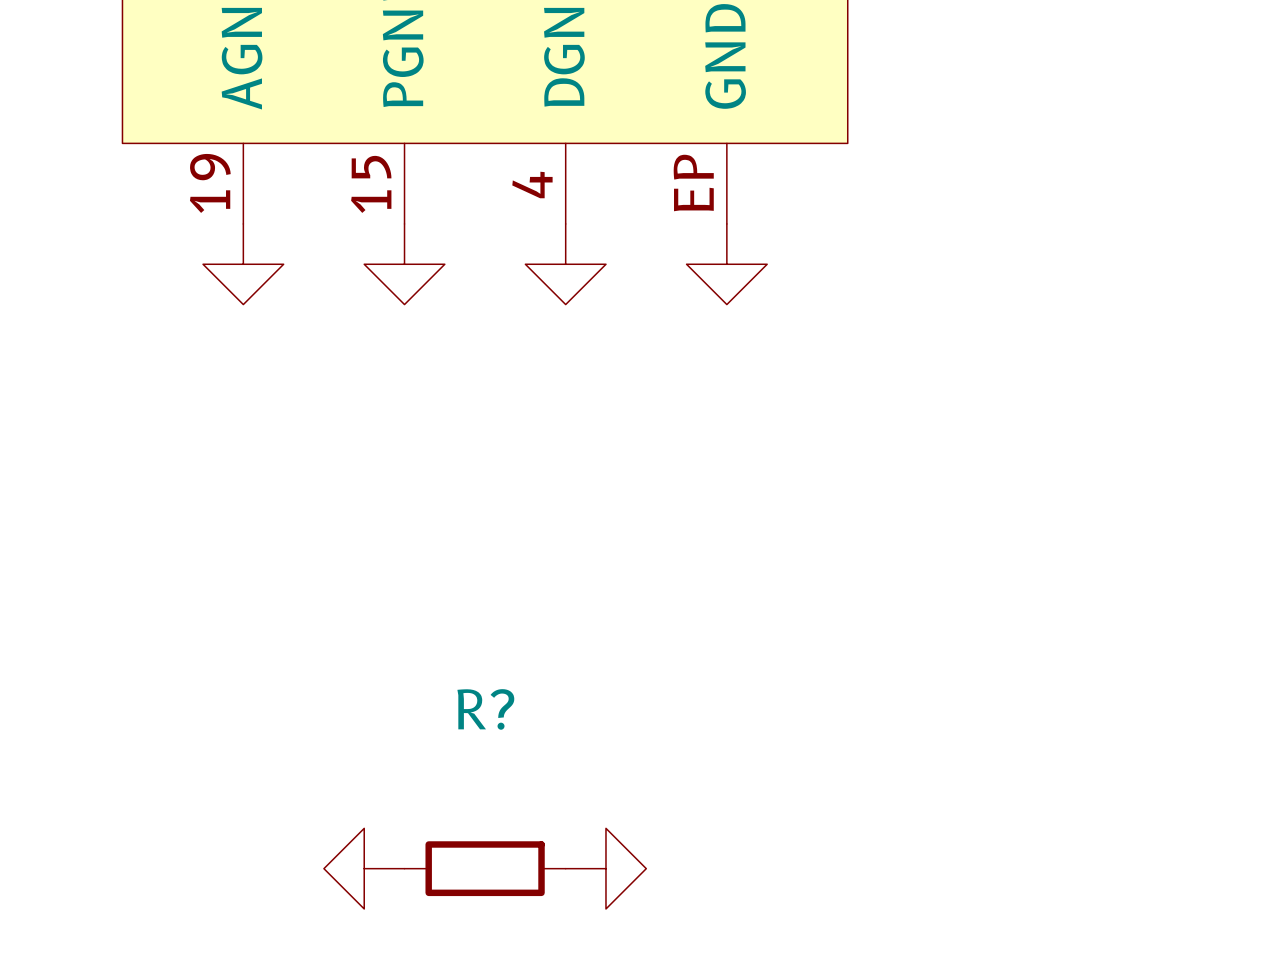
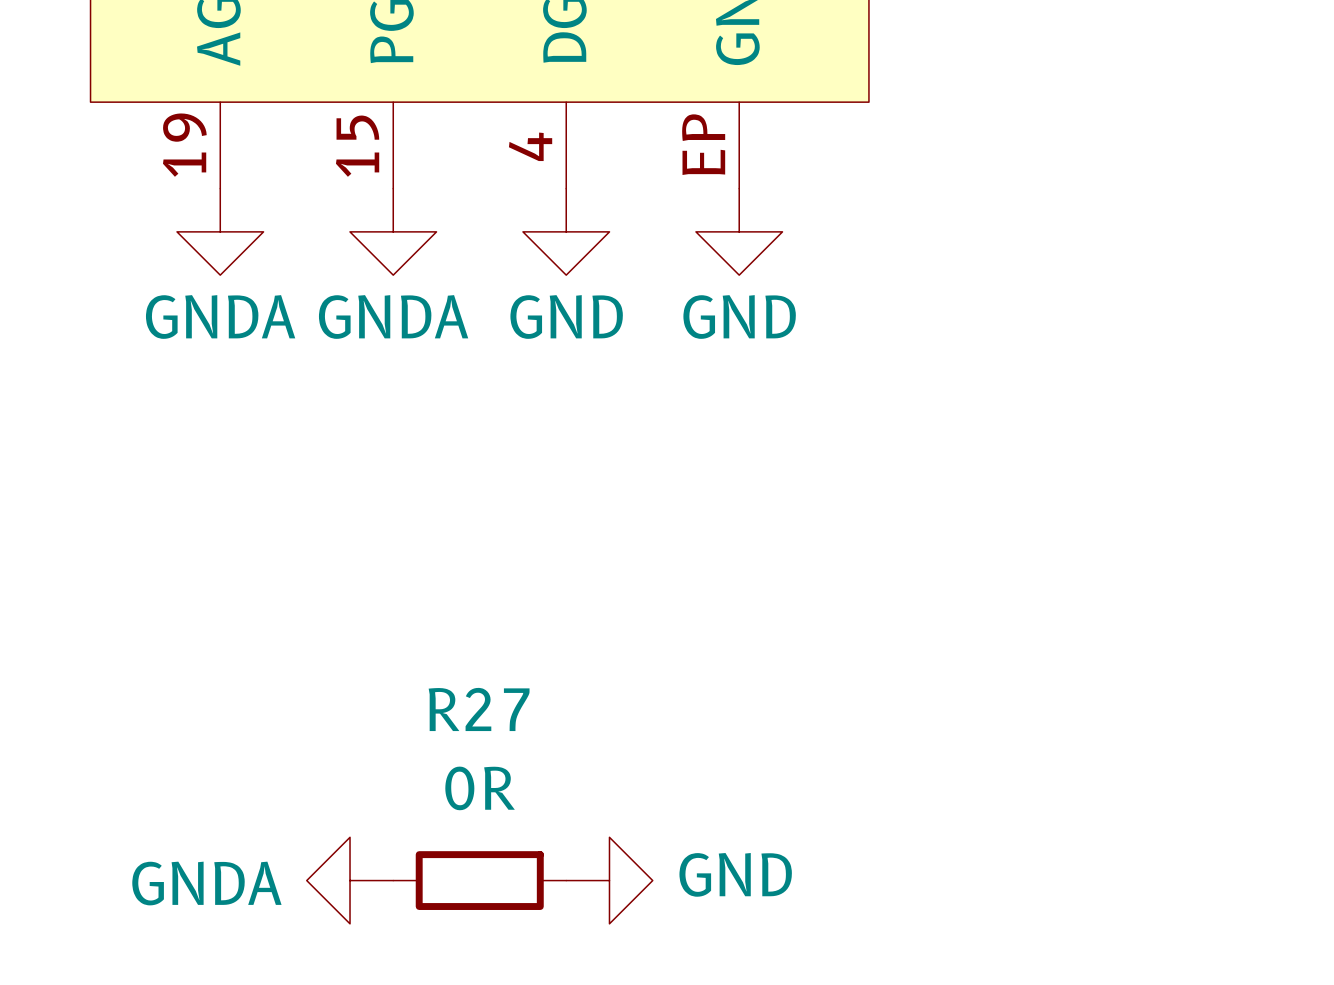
power symbol text: none -> GNDA (220, 317)
power symbol text: none -> GNDA (393, 317)
power symbol text: none -> GND (566, 317)
power symbol text: none -> GND (739, 317)
R? name: R? (485, 709) -> R27 (479, 709)
R? value: none -> 0R (480, 788)
power symbol text: none -> GND (735, 874)
power symbol text: none -> GNDA (206, 883)

